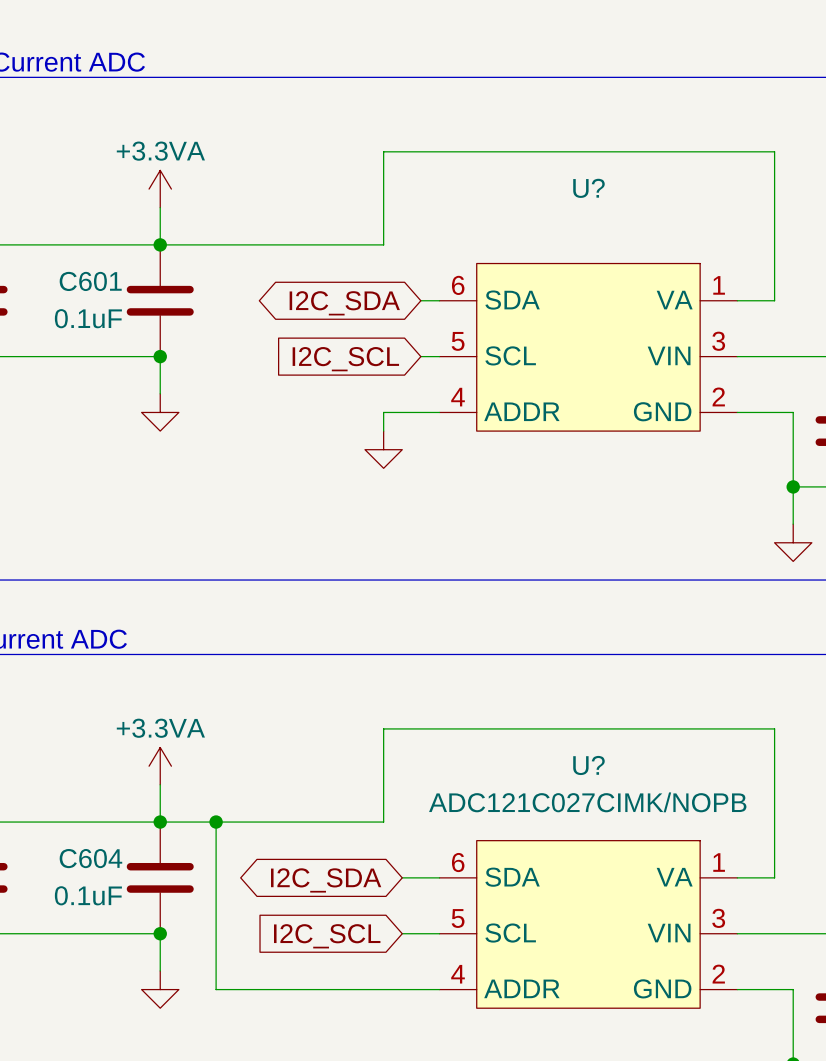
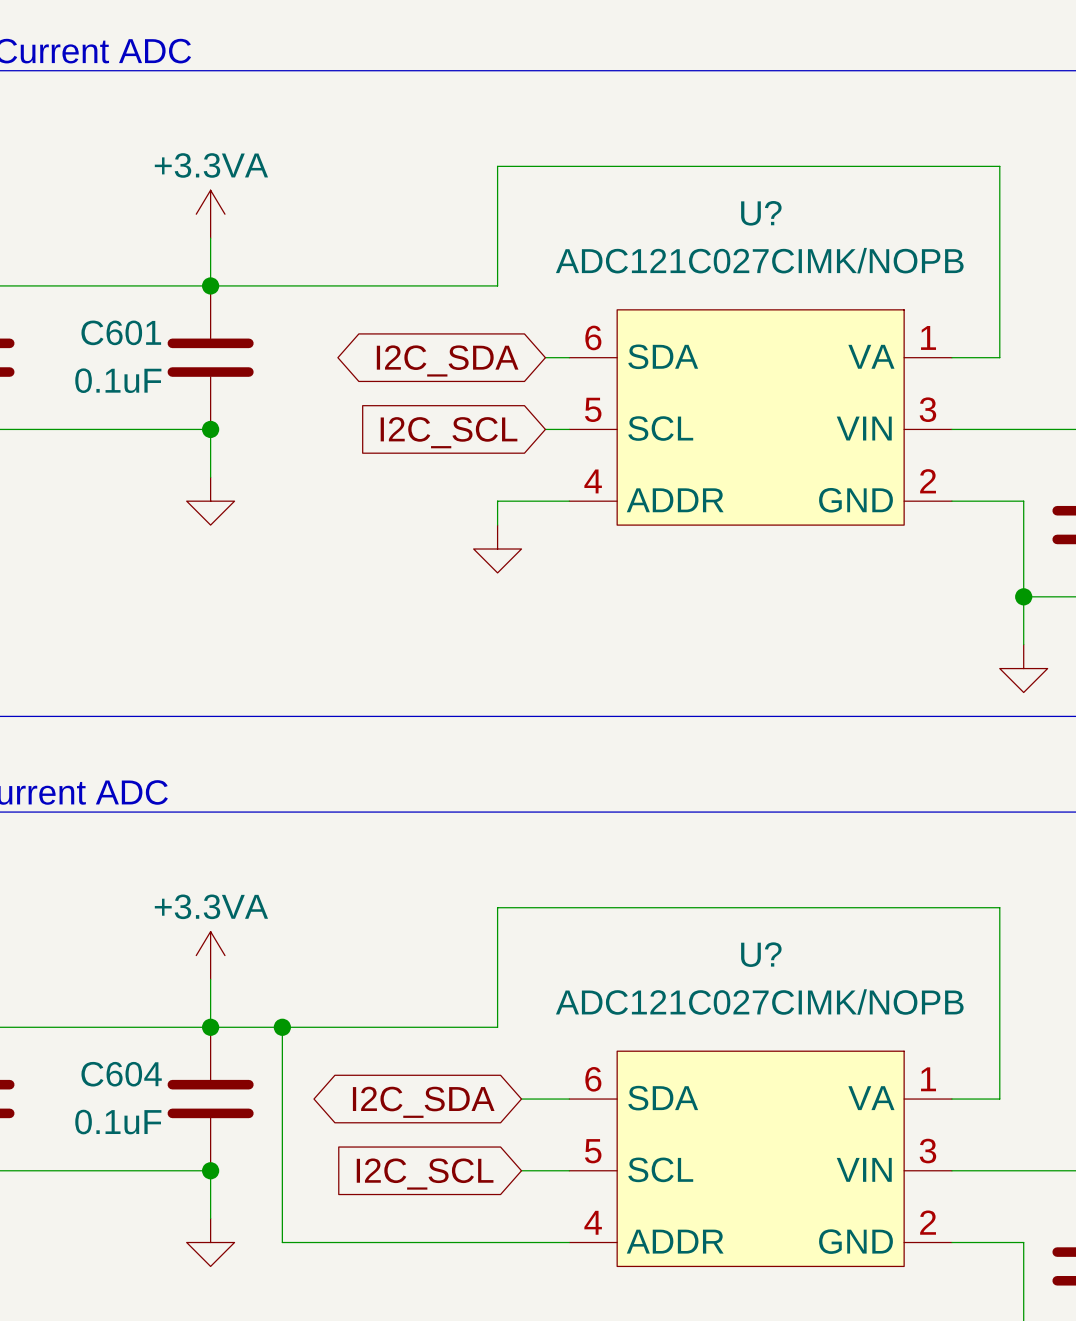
U? value: none -> ADC121C027CIMK/NOPB (759, 260)

